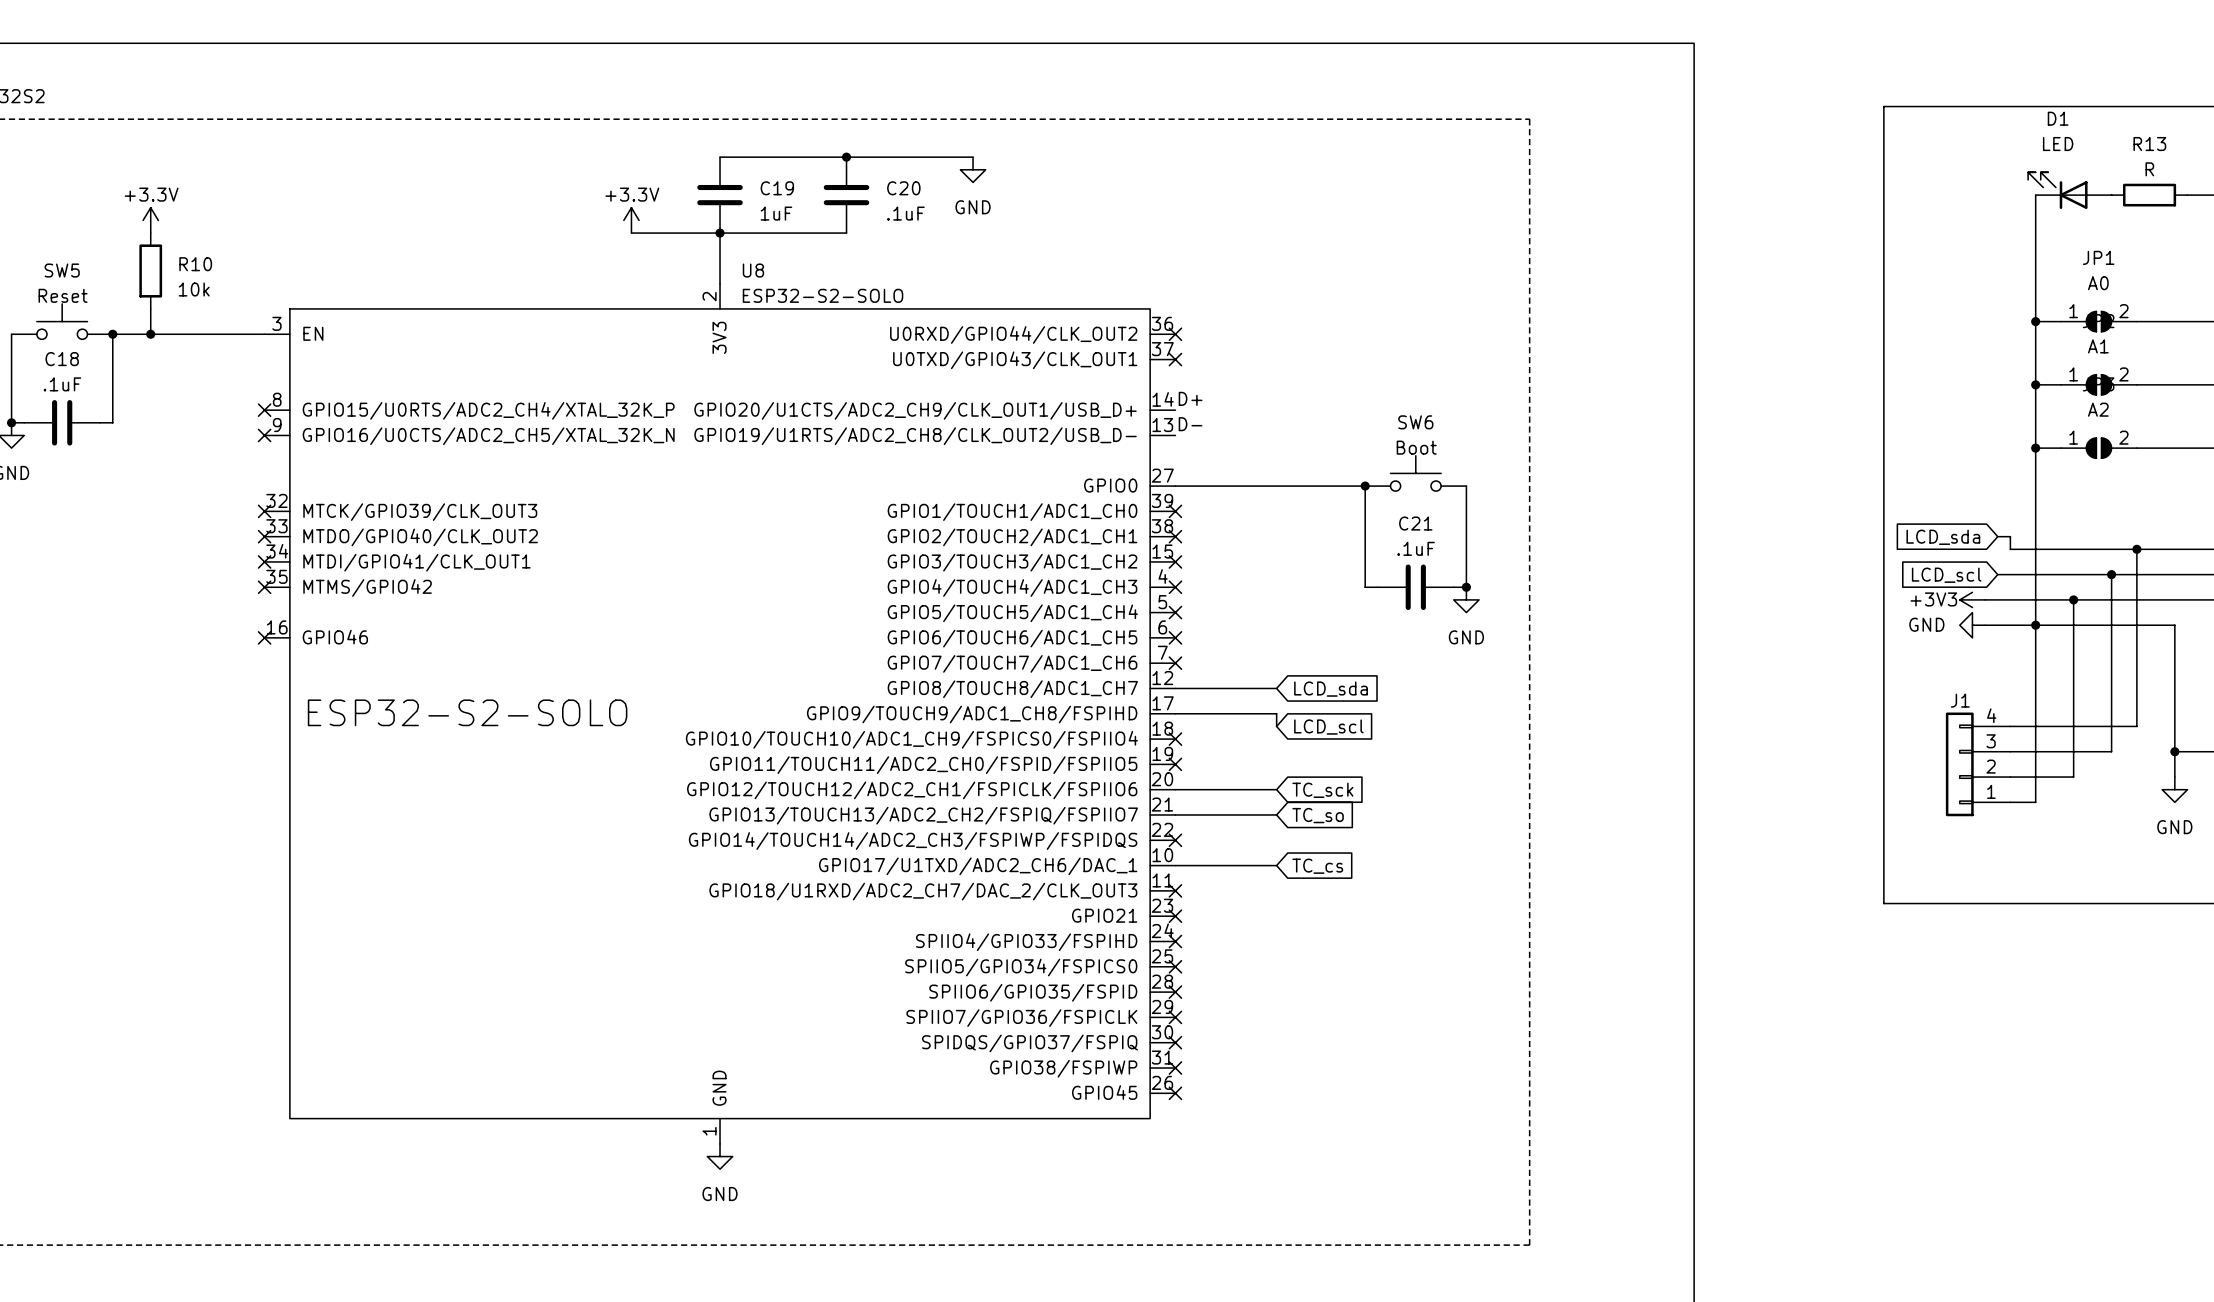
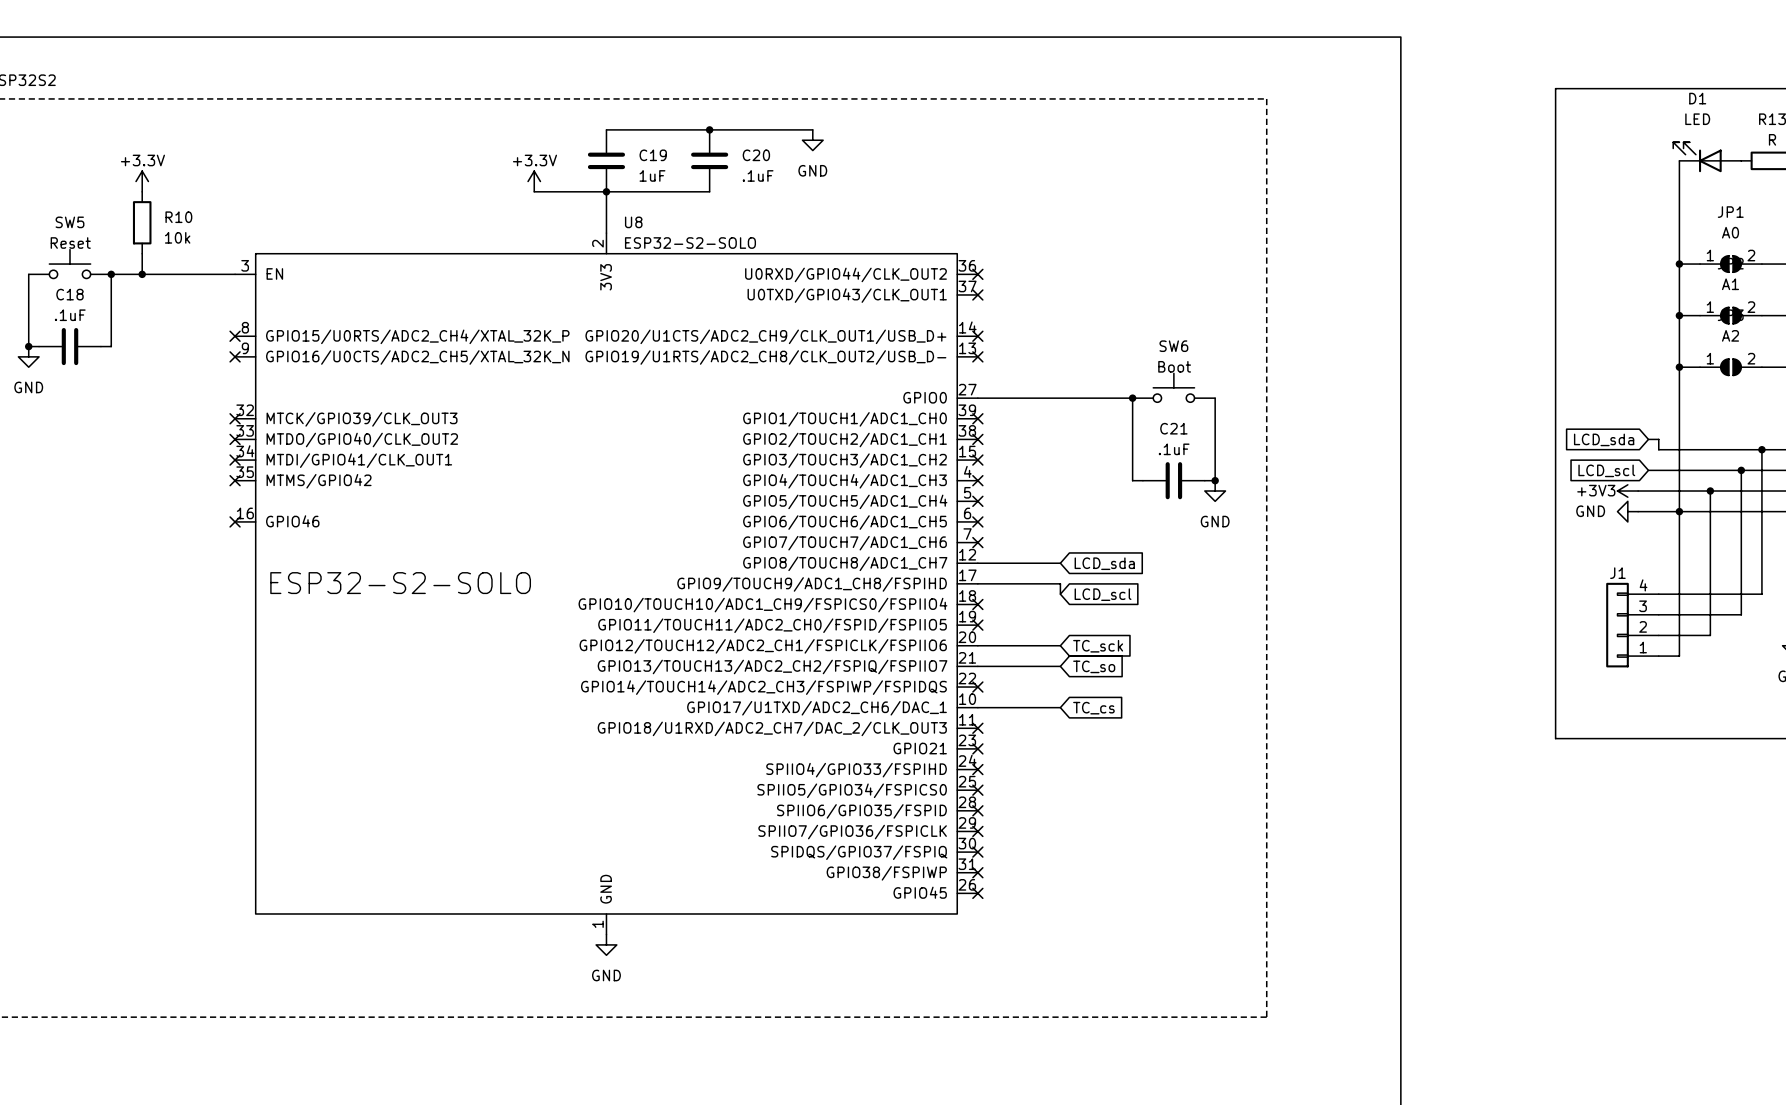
label: D+ (1190, 398) -> none
no-connect mark: none -> (977, 336)
label: D- (1190, 424) -> none
no-connect mark: none -> (977, 356)

